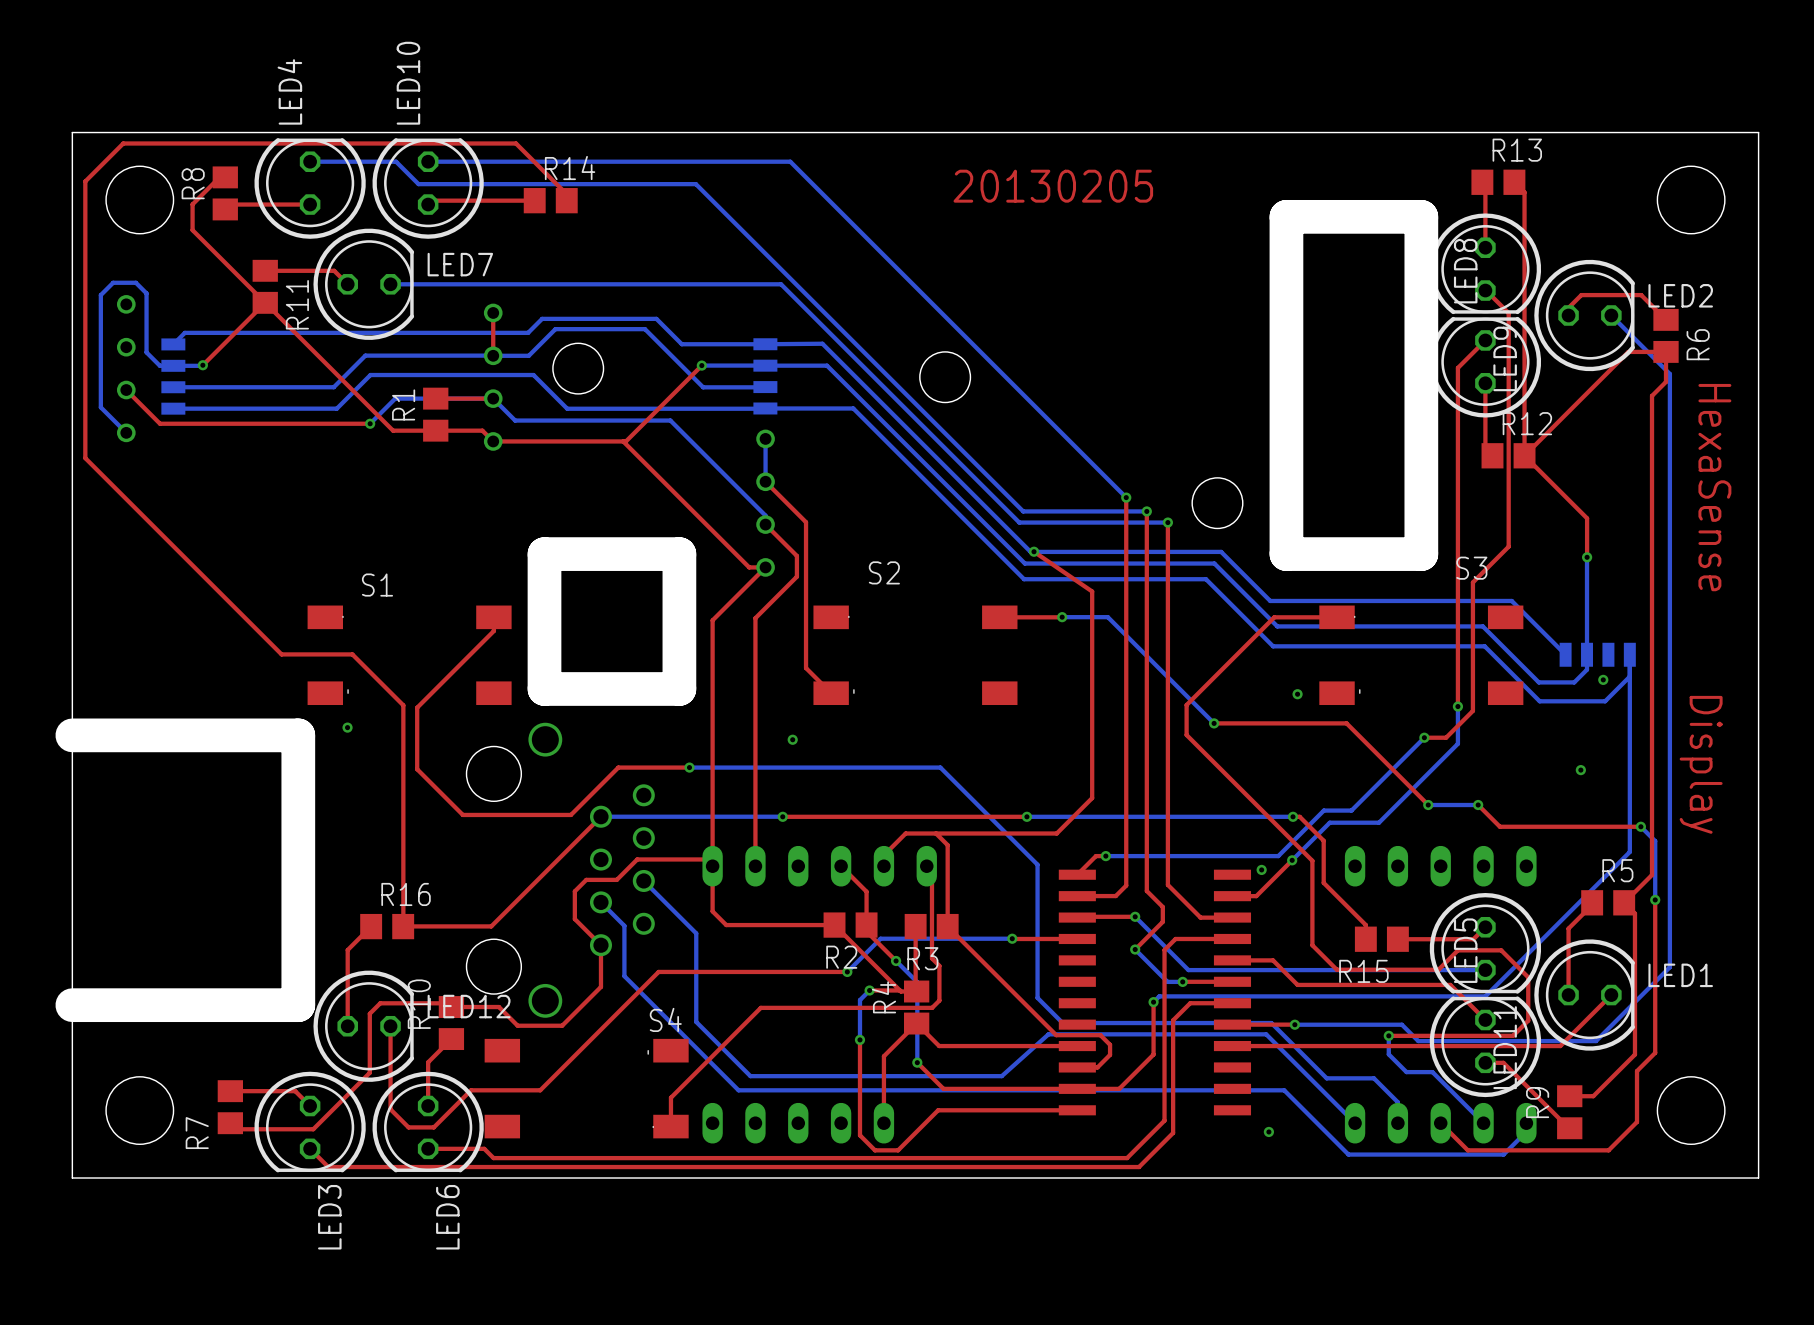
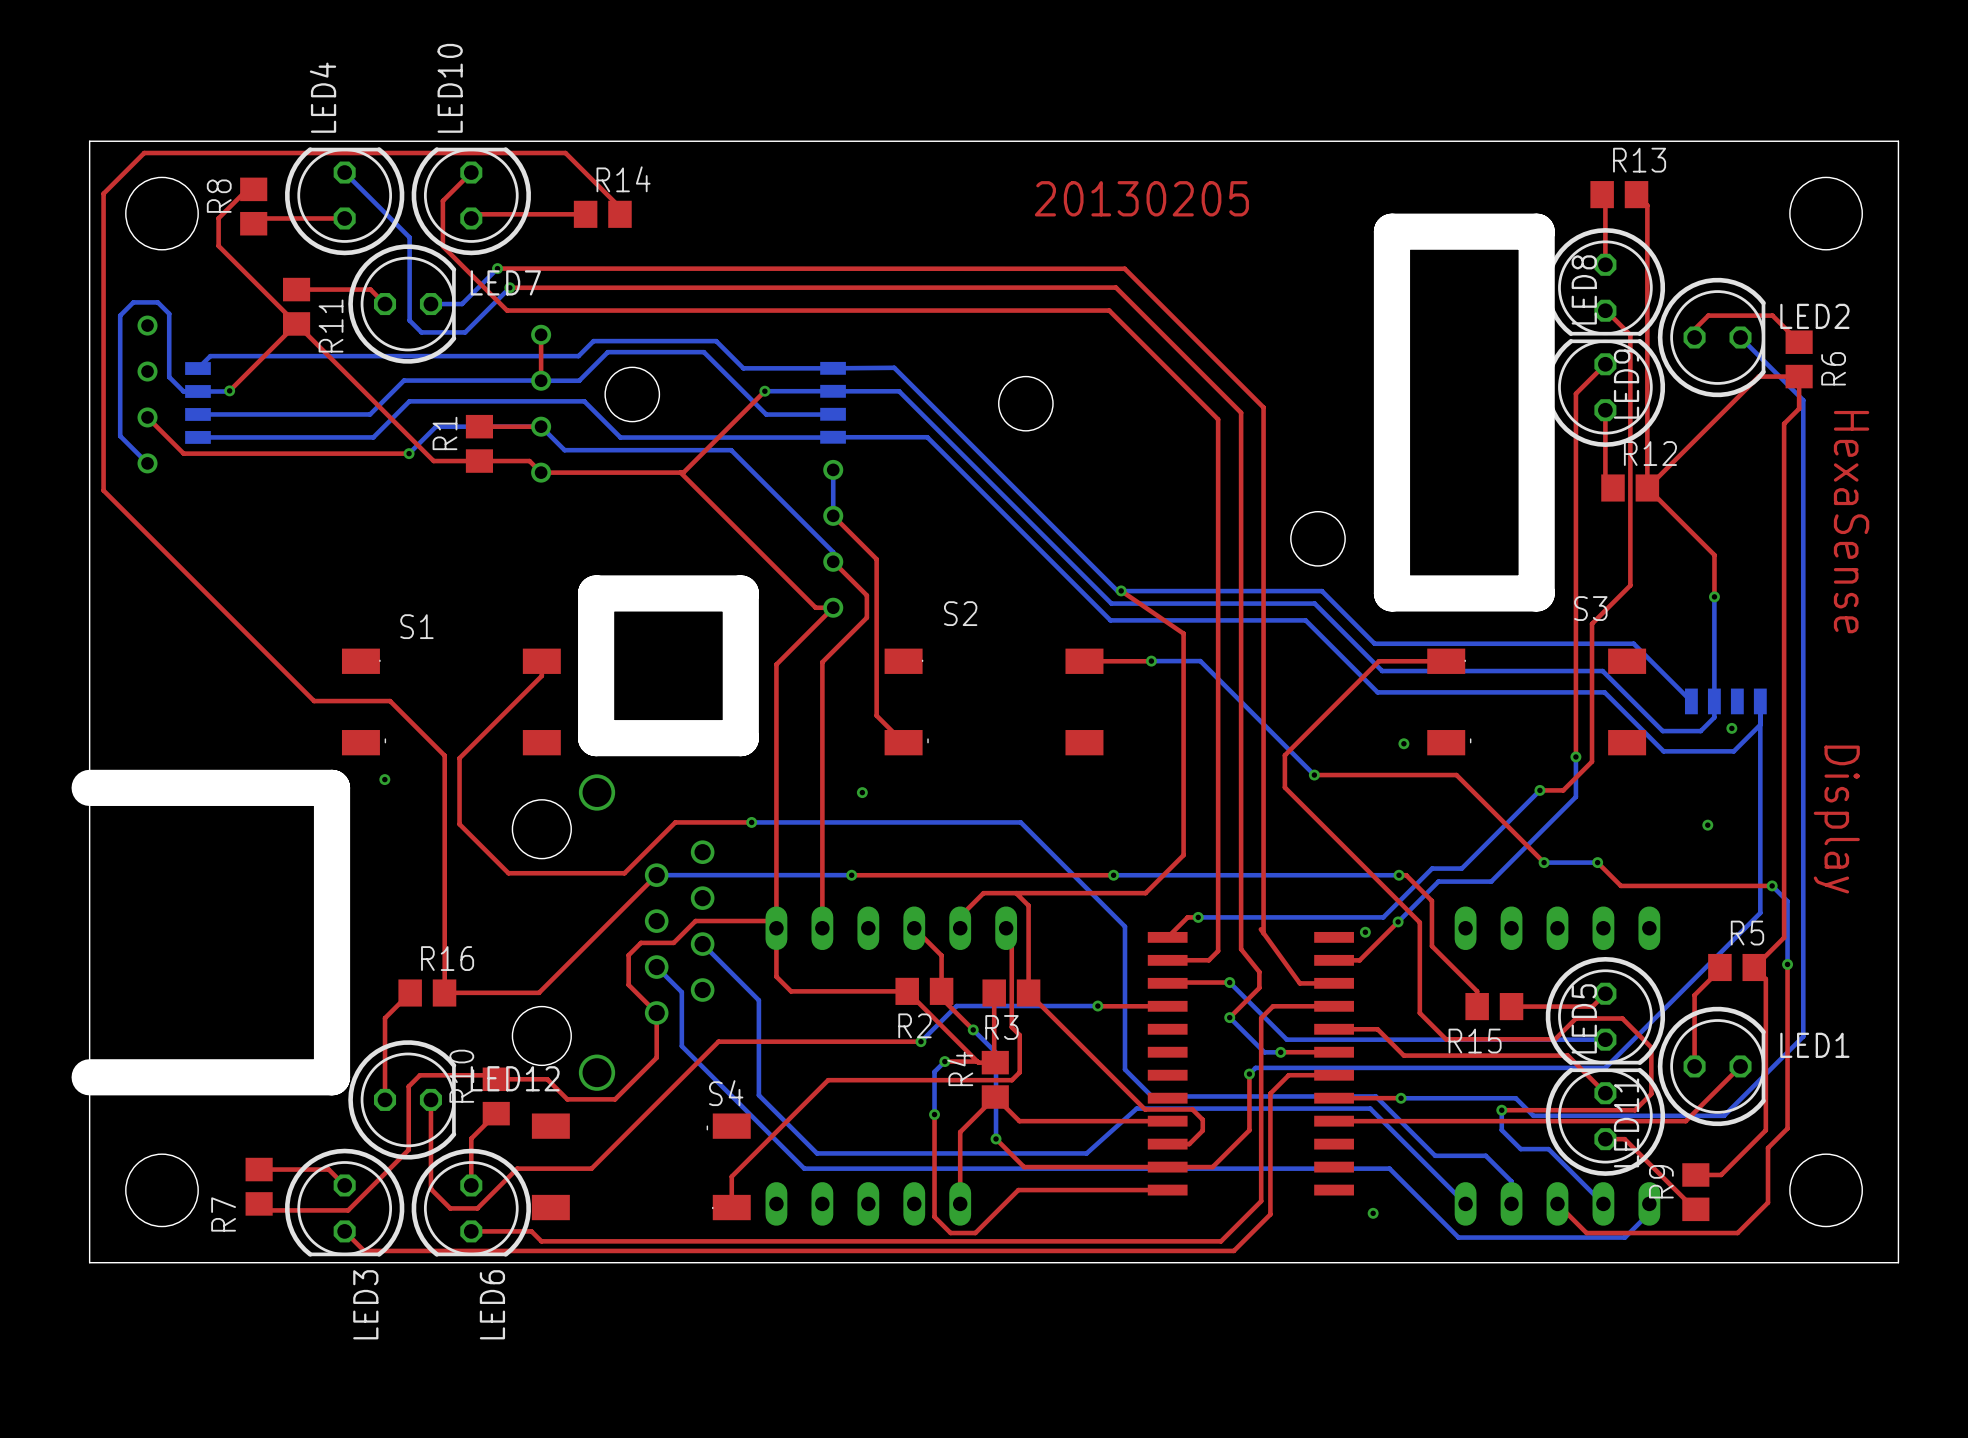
bottom track: (310, 161) (396, 161) (418, 184) (695, 184) (1023, 511) (1146, 511) -> (344, 172) (409, 237) (409, 320) (421, 332) (465, 332) (509, 287)
bottom track: (428, 161) (790, 161) (1126, 497) -> none
top track: none -> (497, 268) (1124, 268) (1263, 407) (1263, 933)
via: none -> (497, 268)
via: none -> (509, 287)
bottom track: (419, 284) (781, 284) (1019, 522) (1167, 522) -> (462, 304) (497, 268)
top track: (1126, 497) (1126, 885) (1124, 887) -> (471, 172) (442, 200) (442, 246) (507, 310) (1109, 310) (1218, 419) (1218, 951)
via: (1126, 497) -> none
top track: (1146, 511) (1146, 891) (1162, 907) -> (509, 287) (1115, 287) (1241, 412) (1241, 949) (1259, 972)
via: (1146, 511) -> none
top track: (1167, 522) (1167, 884) (1200, 917) -> (1260, 929) (1299, 983)
via: (1167, 522) -> none

